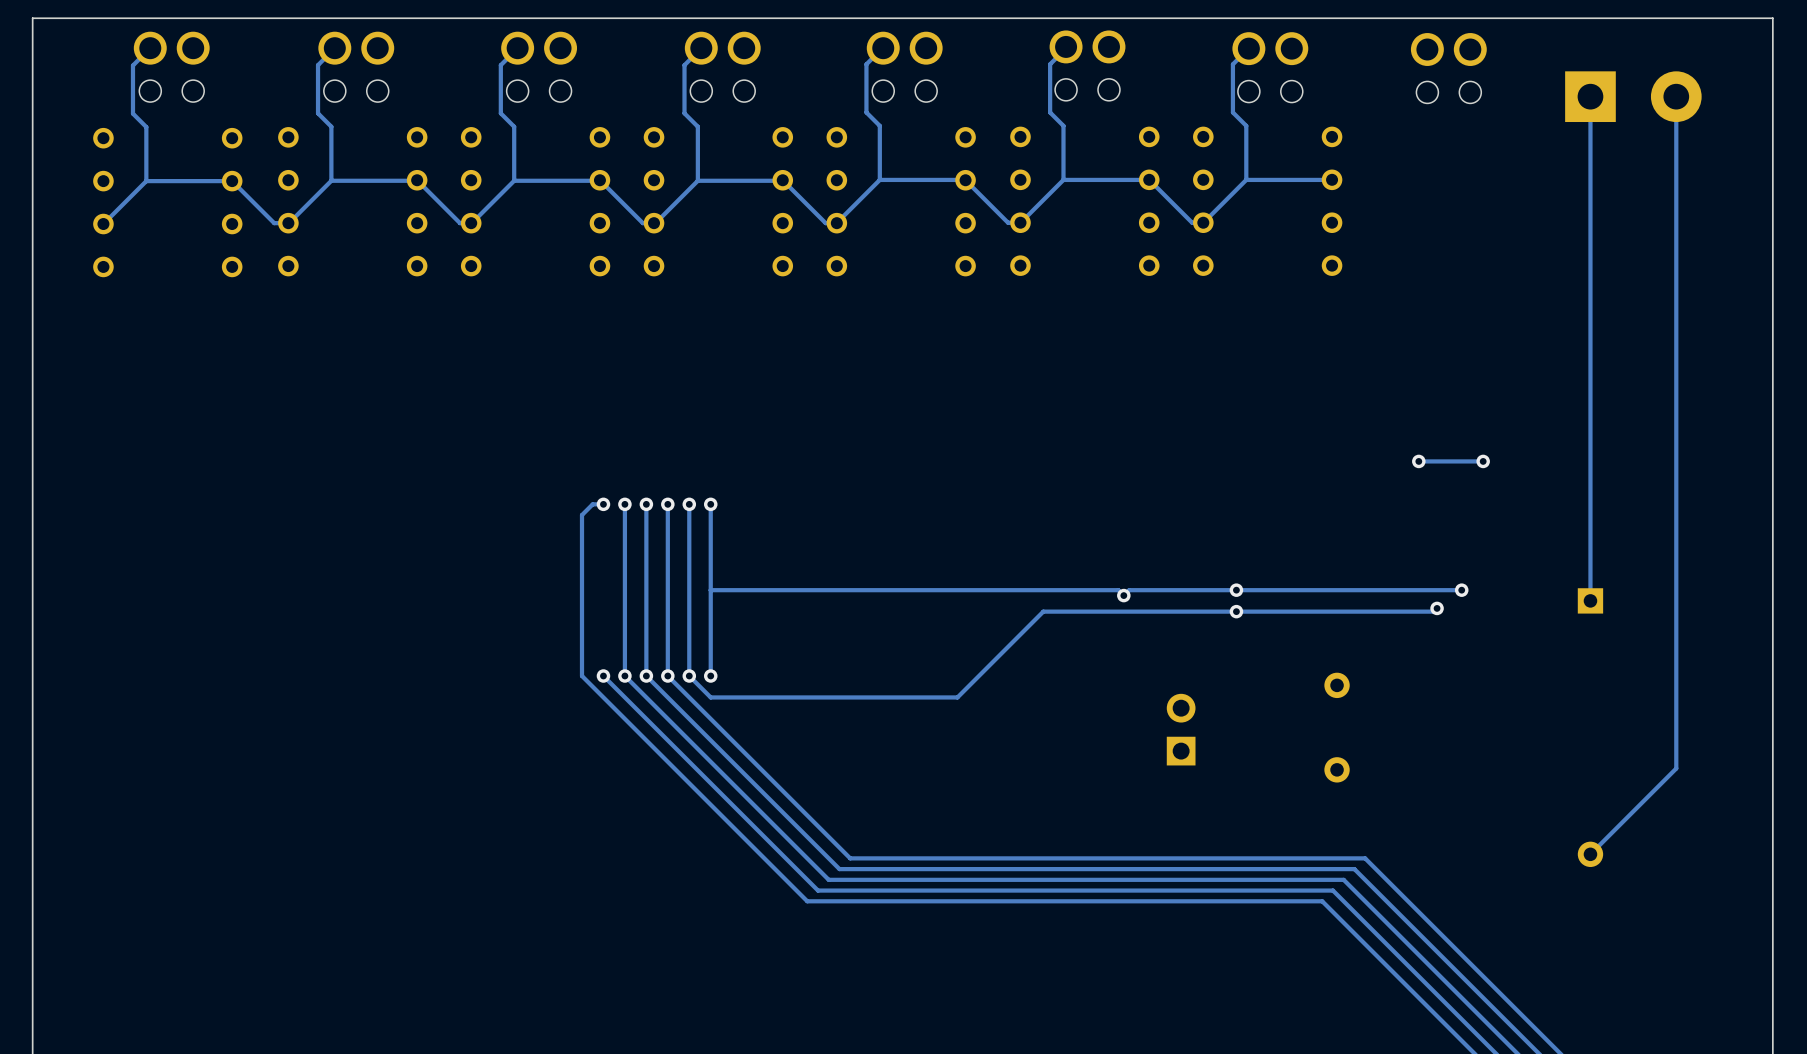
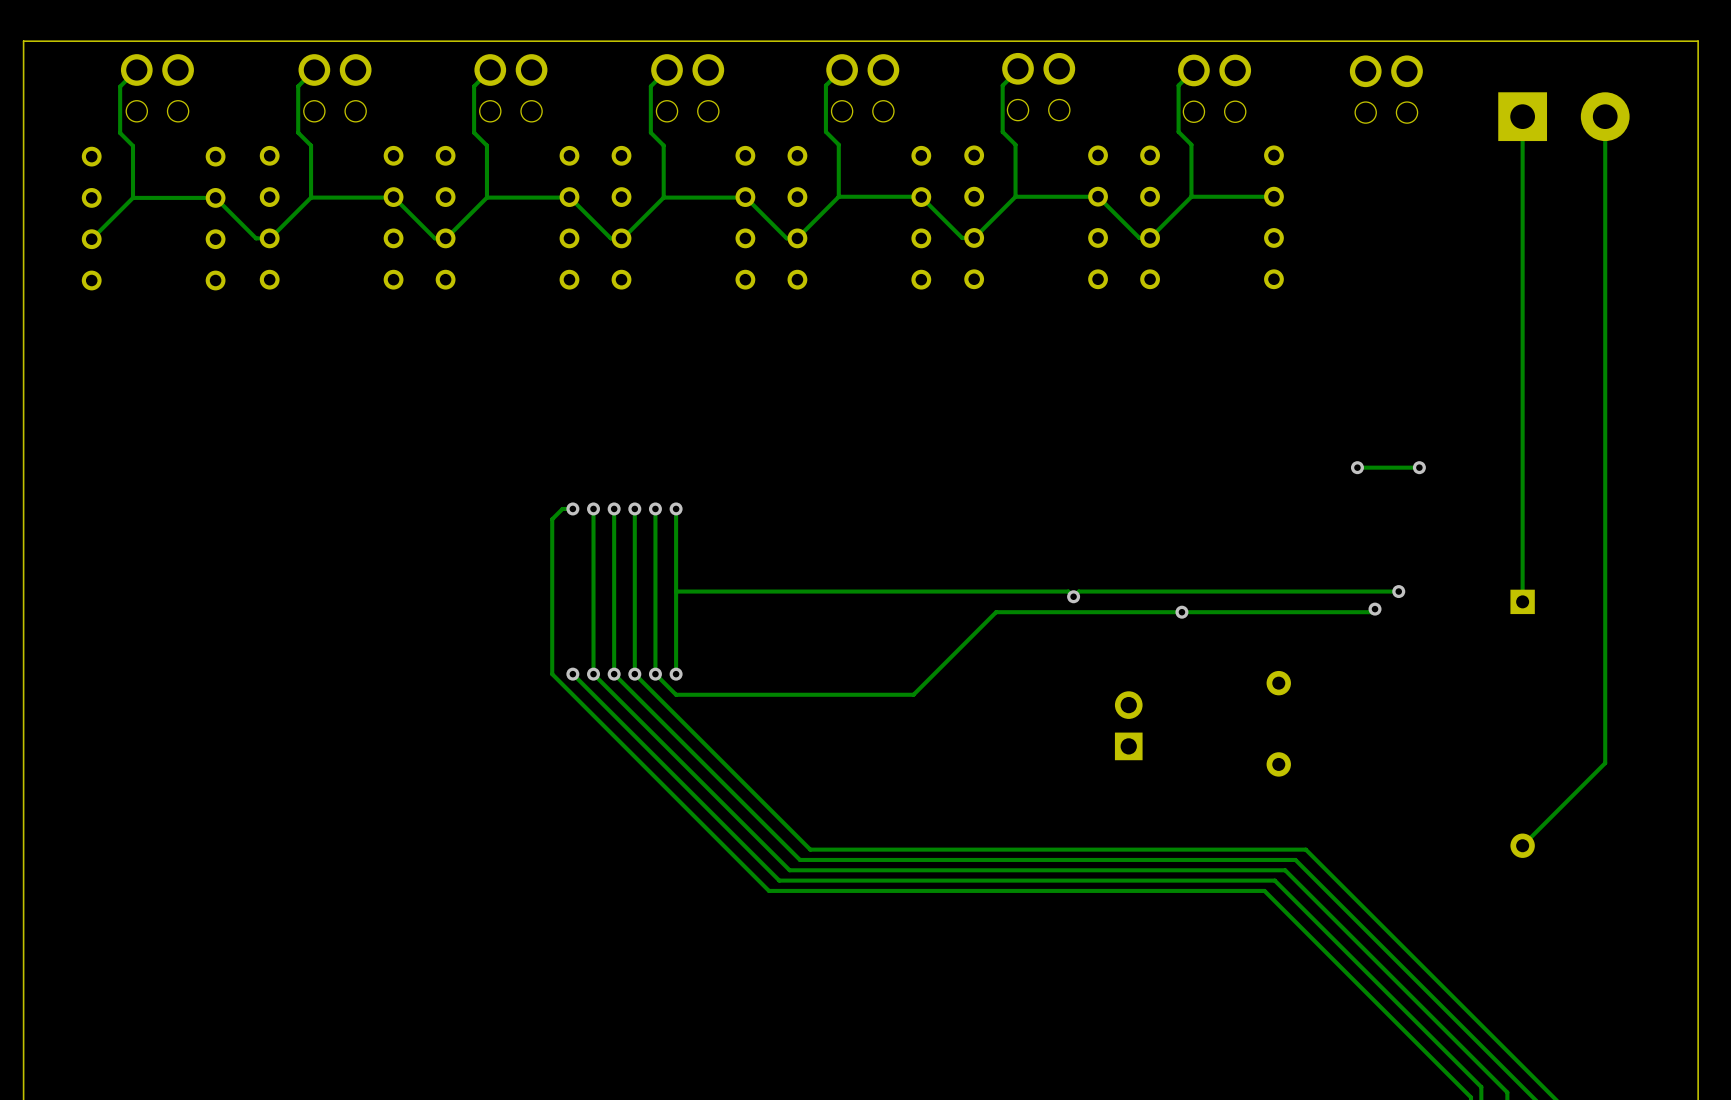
via: (1236, 590) -> none

